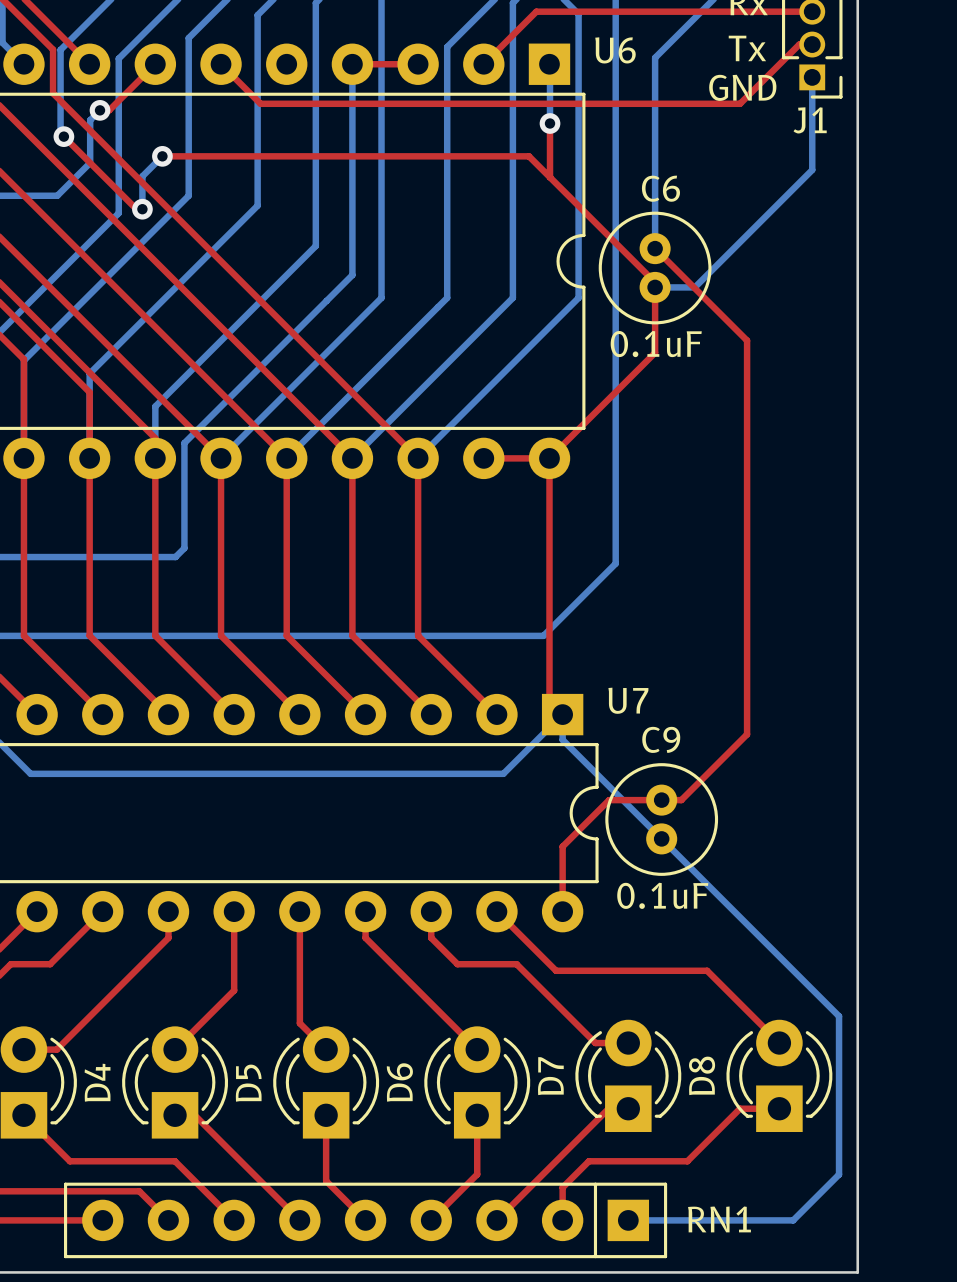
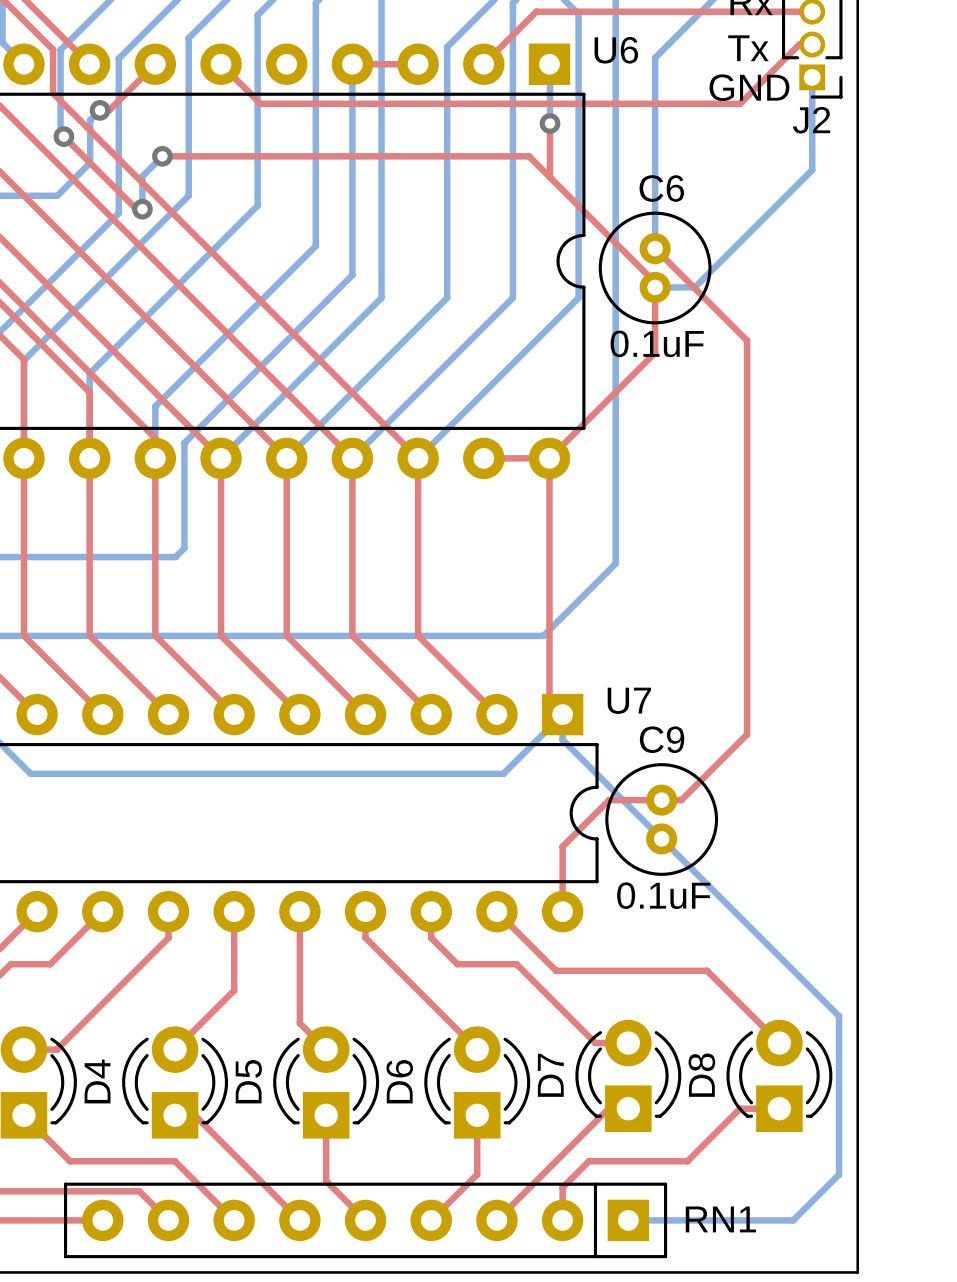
J1 name: J1 (810, 120) -> J2 (811, 120)

